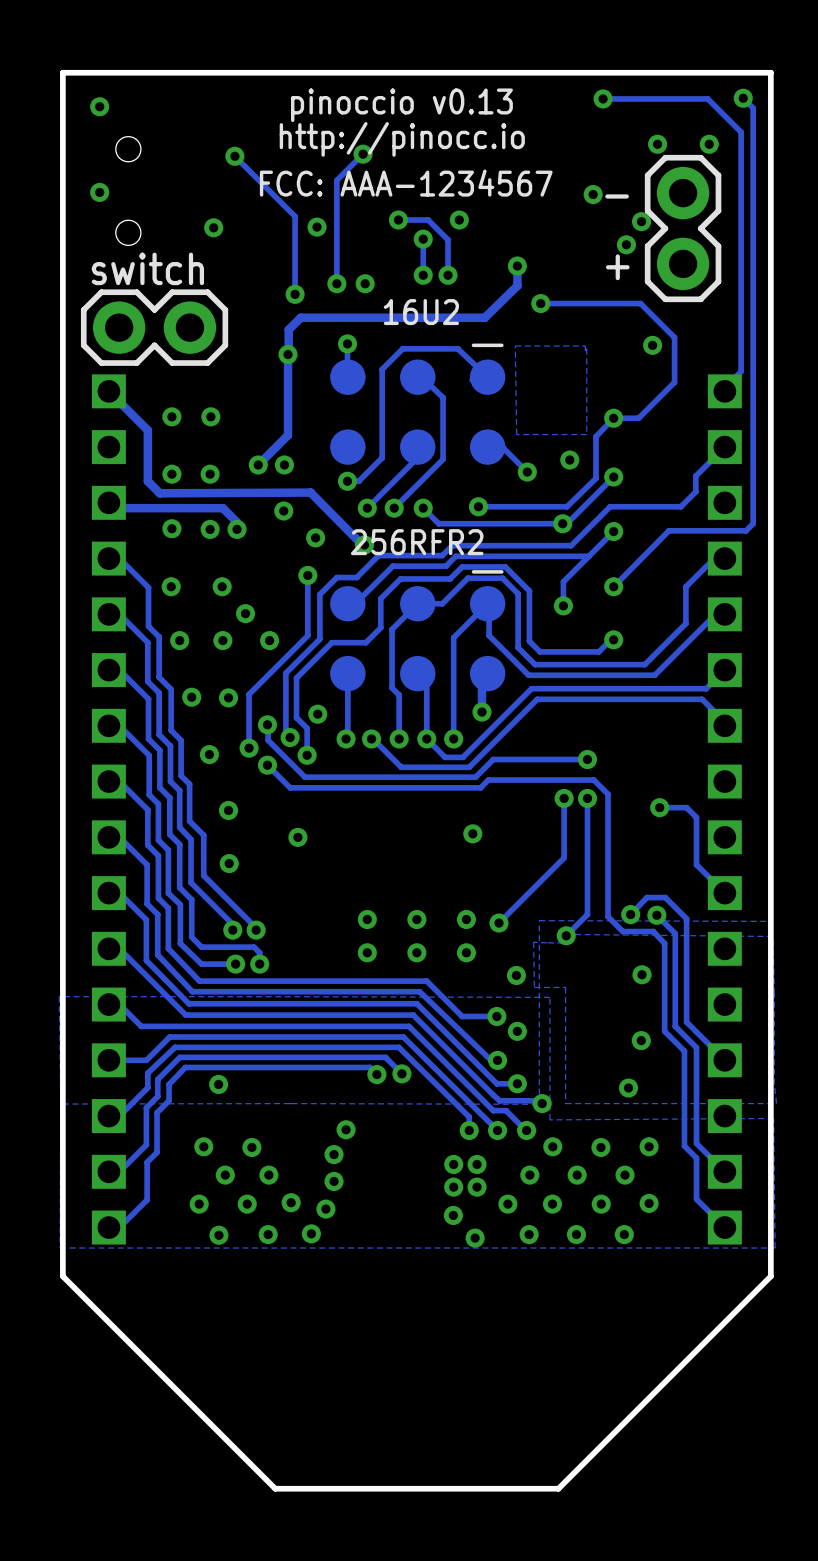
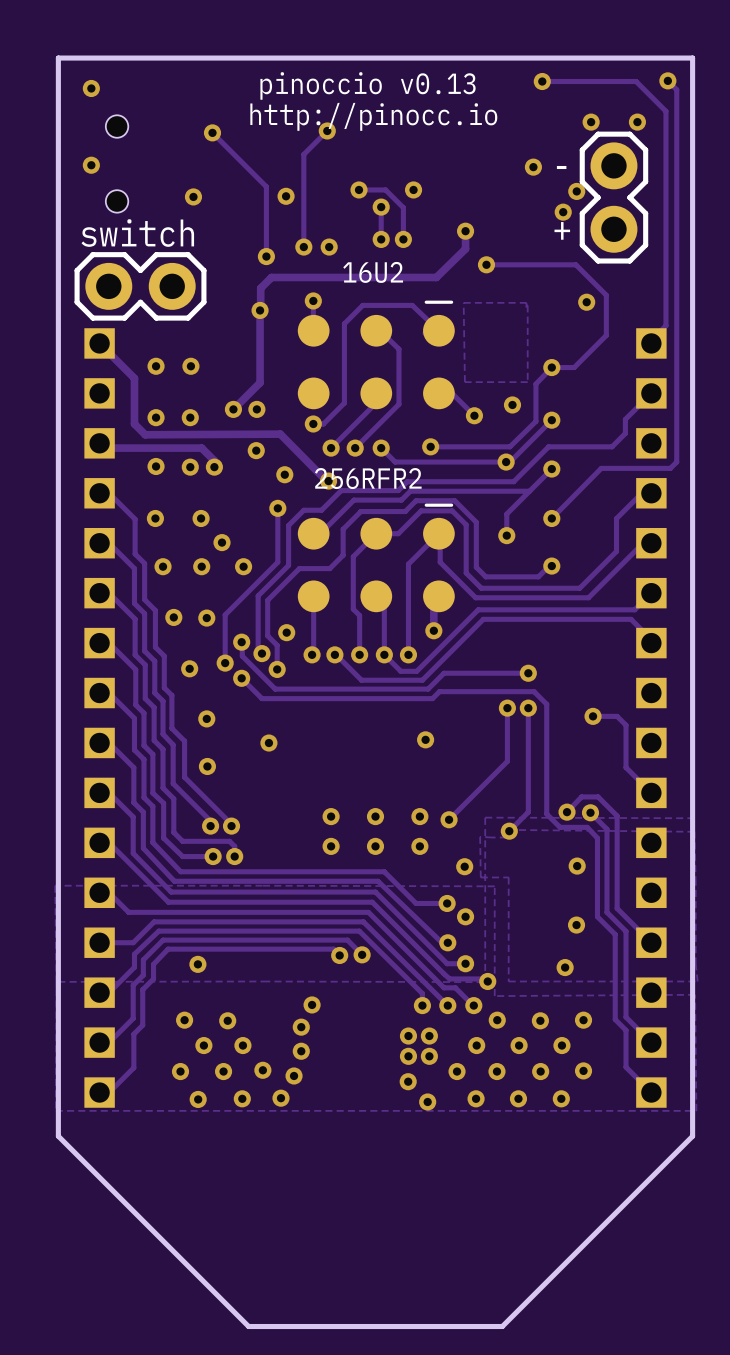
text: FCC: AAA-1234567 (406, 183) -> none

